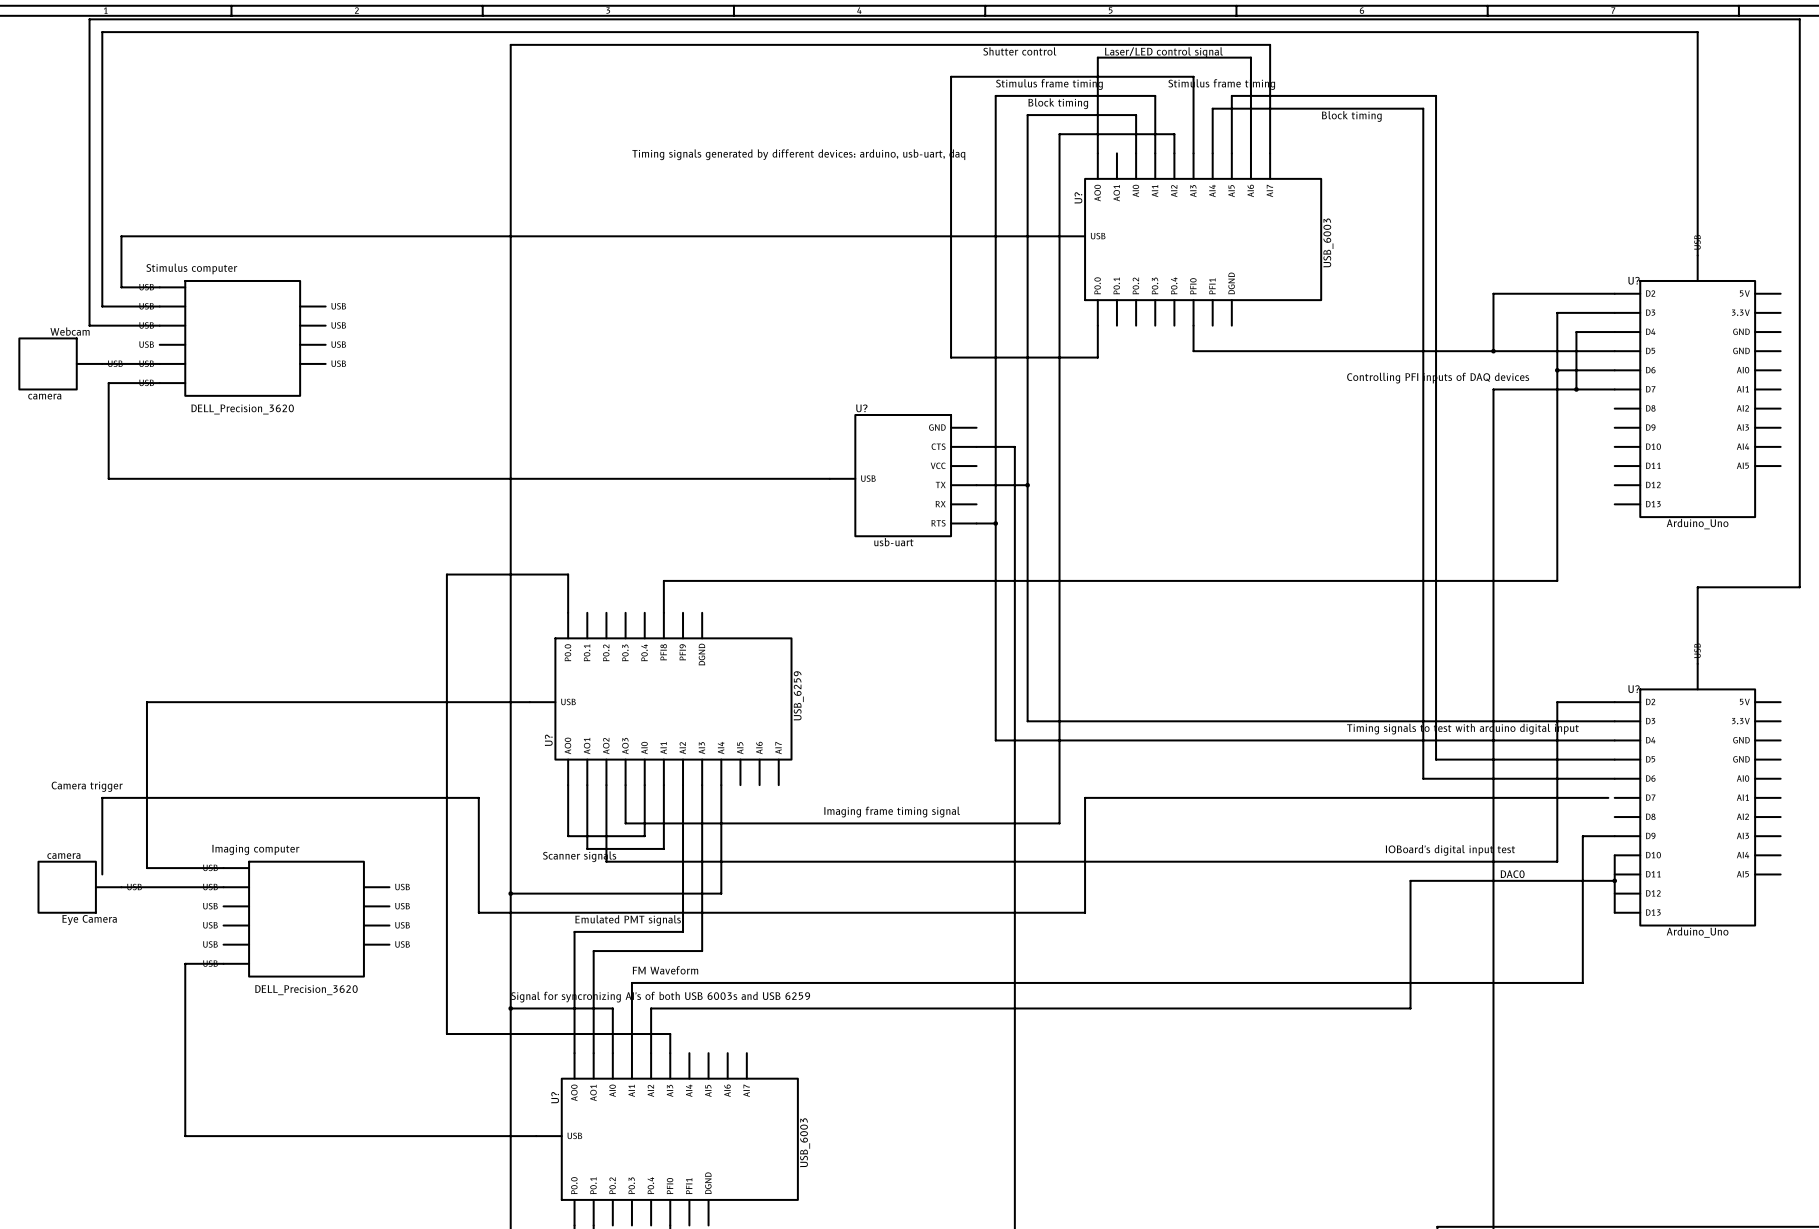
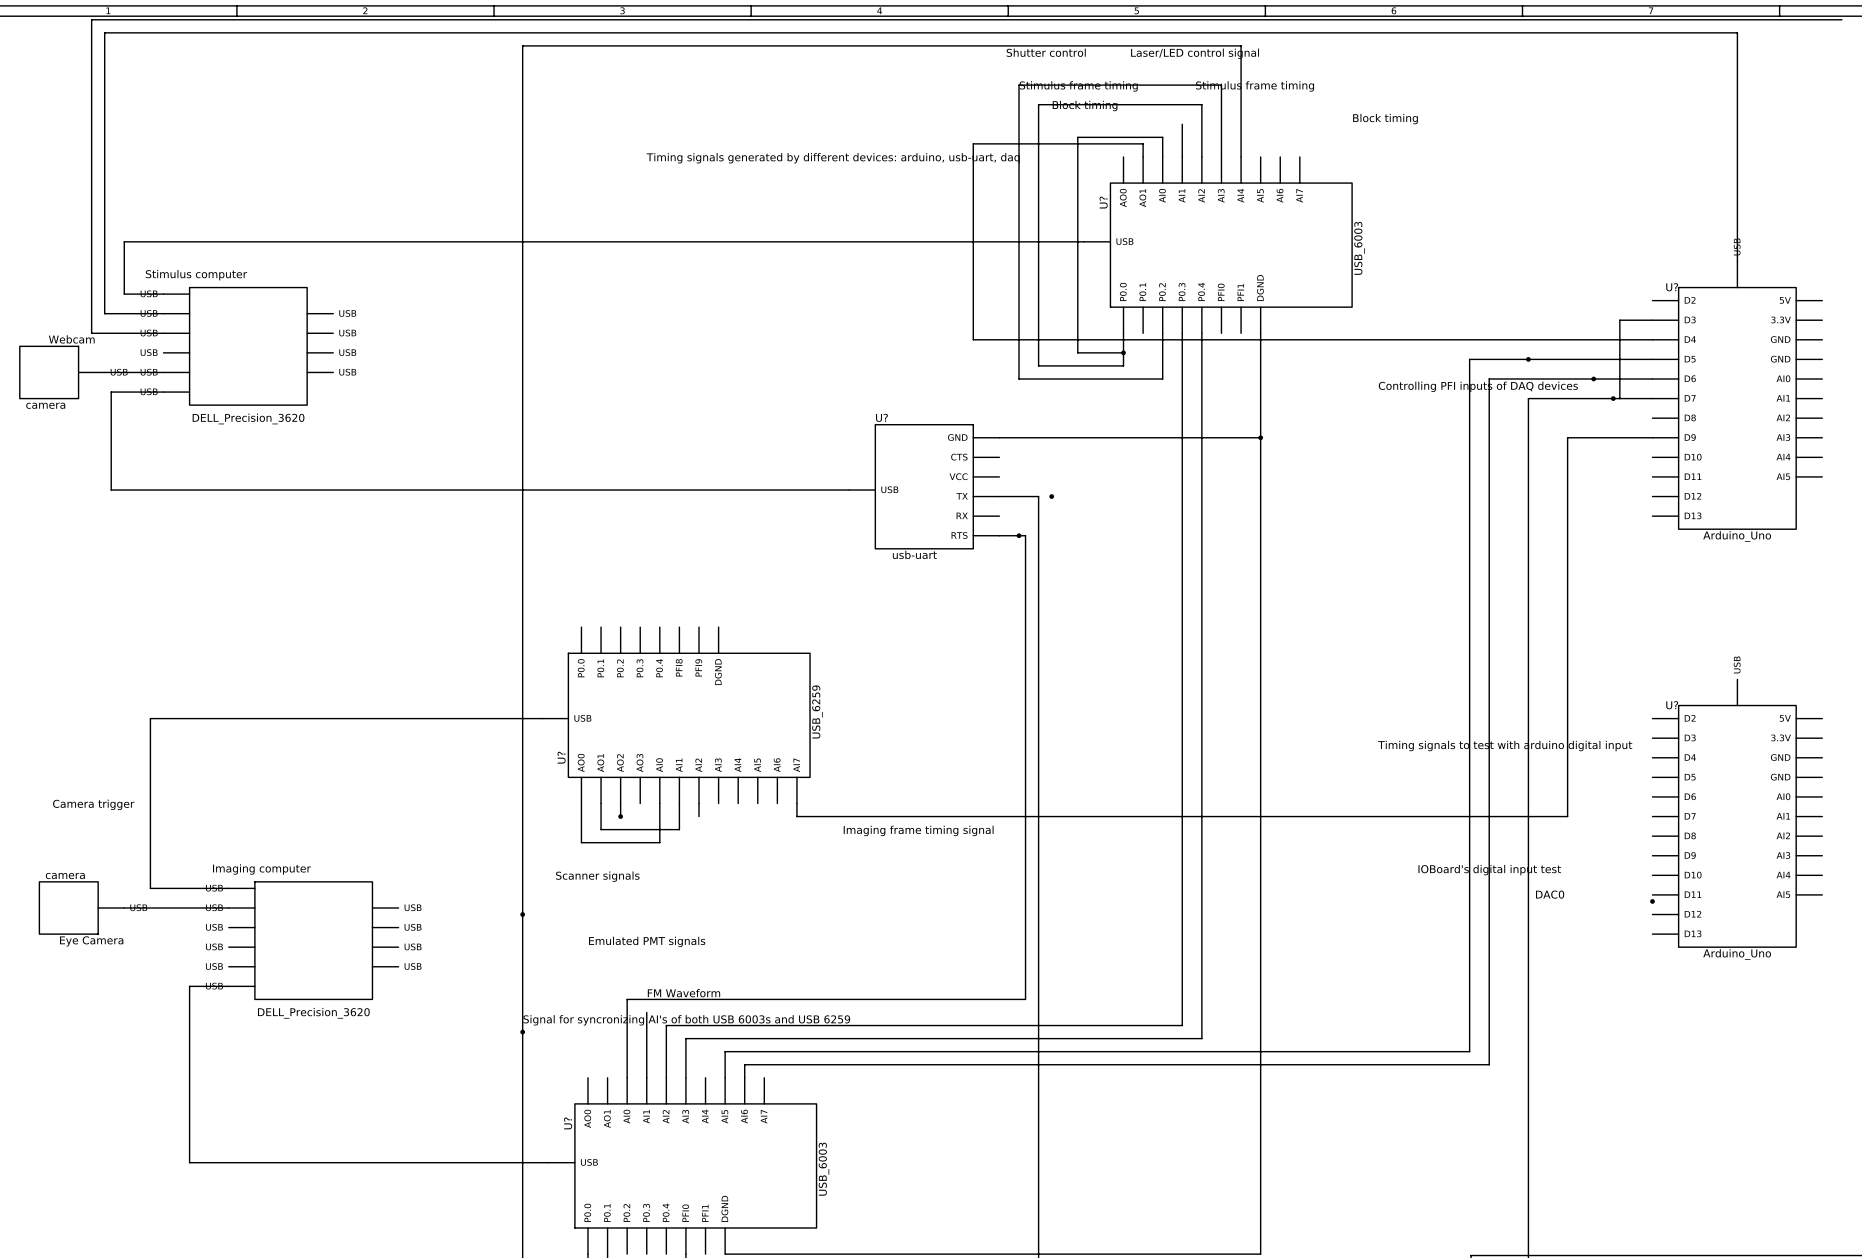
wire: (1799, 19) (1799, 587) (1697, 587) (1697, 663) -> none
wire: (1212, 44) (1270, 44) (1270, 153) -> (1241, 45) (1241, 111)
wire: (1193, 83) (1193, 76) (951, 76) (951, 140) -> (1143, 156) (1143, 143) (973, 143)
wire: (995, 95) (1155, 95) (1155, 121) -> (1019, 98) (1019, 85) (1221, 85)
wire: (1212, 108) (1423, 108) (1423, 778) (1614, 778) -> none
wire: (1059, 134) (1059, 823) (644, 823) (644, 836) (568, 836) (568, 823) -> (1084, 137) (1077, 137) (1077, 352) (1123, 352)
wire: (1174, 134) (1136, 134) (1136, 115) (1027, 115) (1027, 721) (1614, 721) -> none
wire: (1097, 153) (1097, 57) (1250, 57) (1250, 153) -> none
wire: (1231, 153) (1231, 95) (1436, 95) (1436, 351) (1193, 351) (1193, 325) -> none
wire: (1614, 293) (1493, 293) (1493, 351) -> none
wire: (1582, 312) (1557, 312) (1557, 580) (663, 580) (663, 612) -> (1619, 320) (1619, 398)
wire: none -> (1260, 333) (1260, 1254) (725, 1254)
wire: (951, 332) (951, 357) (1014, 357) -> (1201, 137) (1201, 104) (1038, 104) (1038, 365)
wire: (1576, 332) (1576, 389) -> (1613, 339) (973, 339)
junction: none -> (1123, 352)
wire: (995, 370) (995, 740) (1614, 740) -> (1019, 378) (1162, 378) (1162, 333)
wire: none -> (1593, 378) (1489, 378) (1489, 1064) (744, 1064) (744, 1077)
wire: none -> (999, 437) (1260, 437)
junction: none -> (1260, 437)
wire: (976, 446) (1014, 446) (1014, 485) (1027, 485) -> none
wire: (568, 612) (568, 574) (446, 574) (446, 1034) (670, 1034) -> (1201, 333) (1201, 1038) (685, 1038) (685, 1058)
wire: (1614, 702) (1557, 702) (1557, 861) (606, 861) (606, 797) -> none
wire: (1436, 759) (1614, 759) -> (1469, 777) (1469, 1051) (725, 1051) (725, 1077)
wire: (625, 785) (625, 823) -> (581, 842) (640, 842)
wire: (702, 785) (702, 951) (593, 951) (593, 1053) -> none
wire: (721, 785) (721, 893) (510, 893) -> none
junction: none -> (620, 816)
wire: (683, 797) (683, 931) (574, 931) (574, 1053) -> none
wire: (1085, 797) (1085, 912) (478, 912) (478, 797) (102, 797) (102, 874) -> (1110, 816) (796, 816) (796, 803)
wire: (1531, 797) (1608, 797) -> (1567, 816) (1567, 437) (1652, 437)
wire: (587, 810) (587, 848) (663, 848) (663, 810) -> (601, 829) (679, 829)
wire: (1614, 836) (1582, 836) (1582, 982) (631, 982) (631, 989) -> none
wire: (1614, 855) (1614, 912) -> none
wire: (1614, 880) (1410, 880) (1410, 1008) (651, 1008) -> (1182, 333) (1182, 1025) (666, 1025) (666, 1032)
wire: (510, 1008) (612, 1008) -> (1019, 535) (1025, 535) (1025, 999) (627, 999) (627, 1032)

